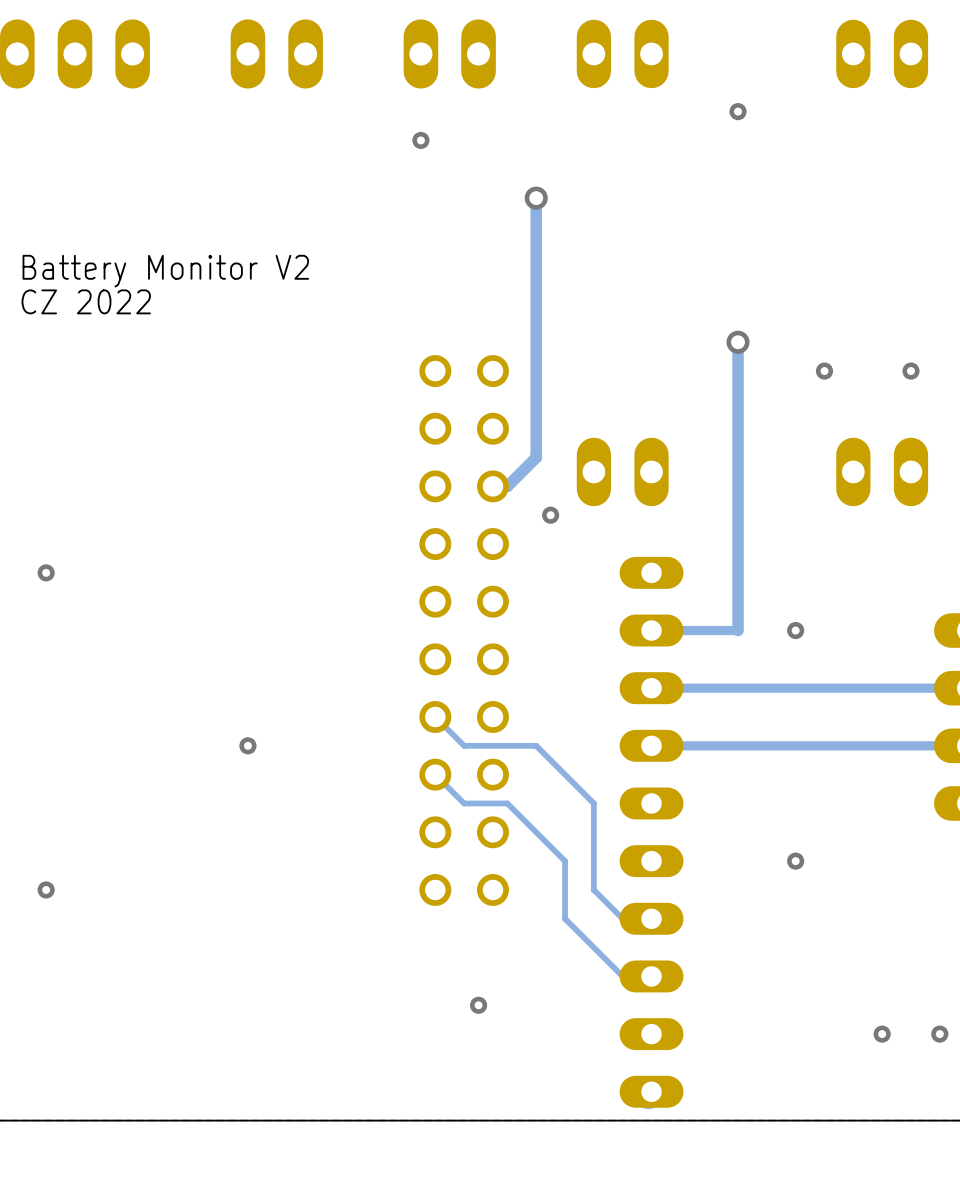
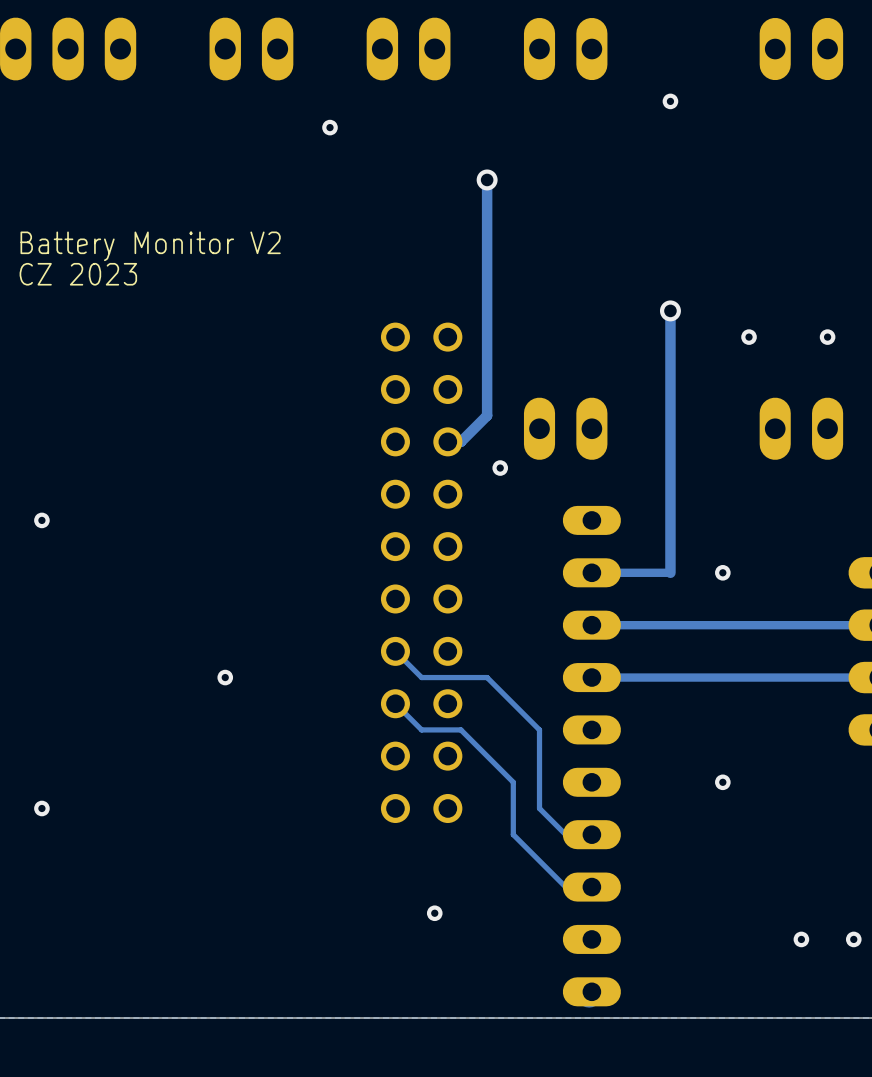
via position: (420, 140) -> (330, 127)
text: CZ 2022 (86, 301) -> CZ 2023 (78, 274)

